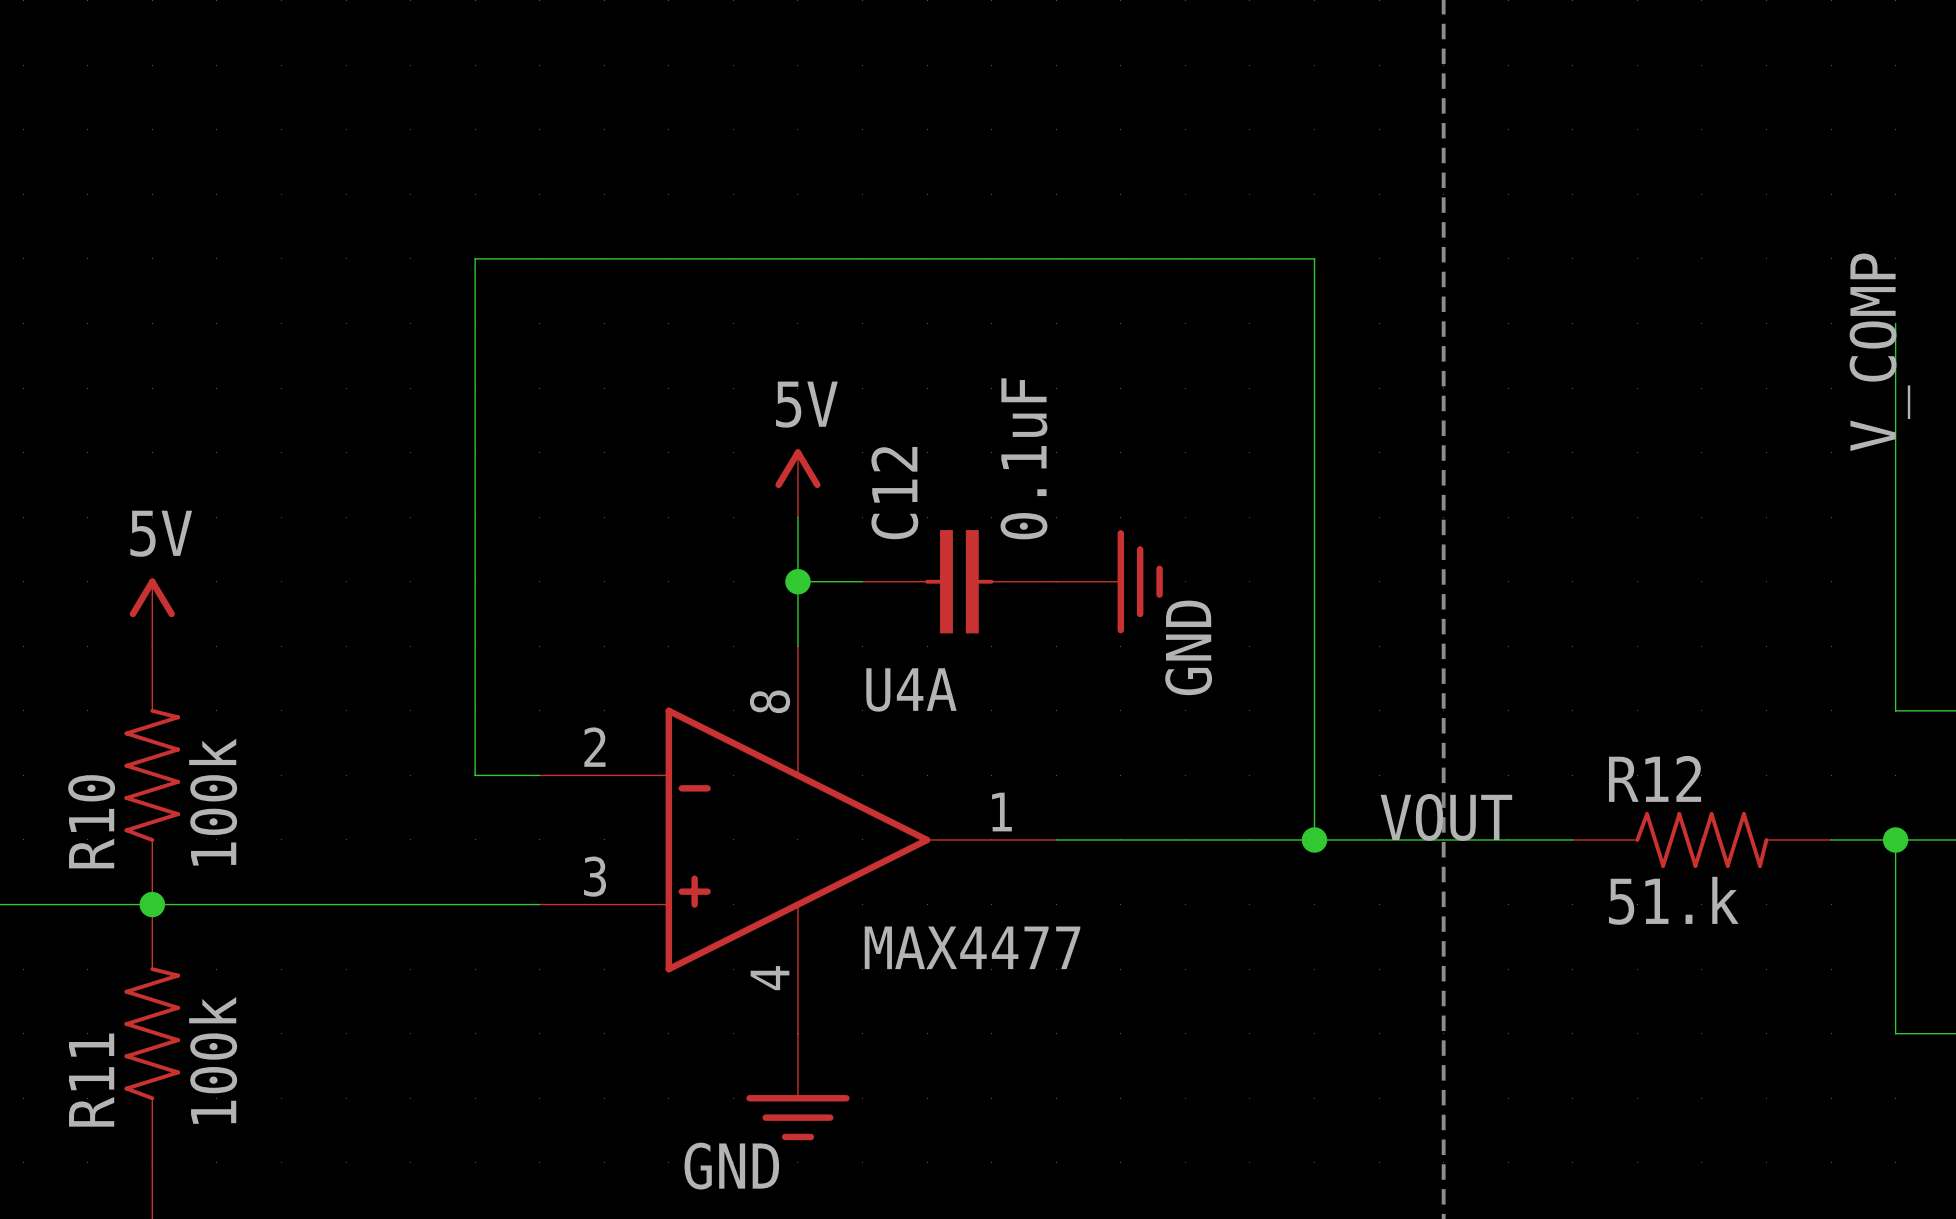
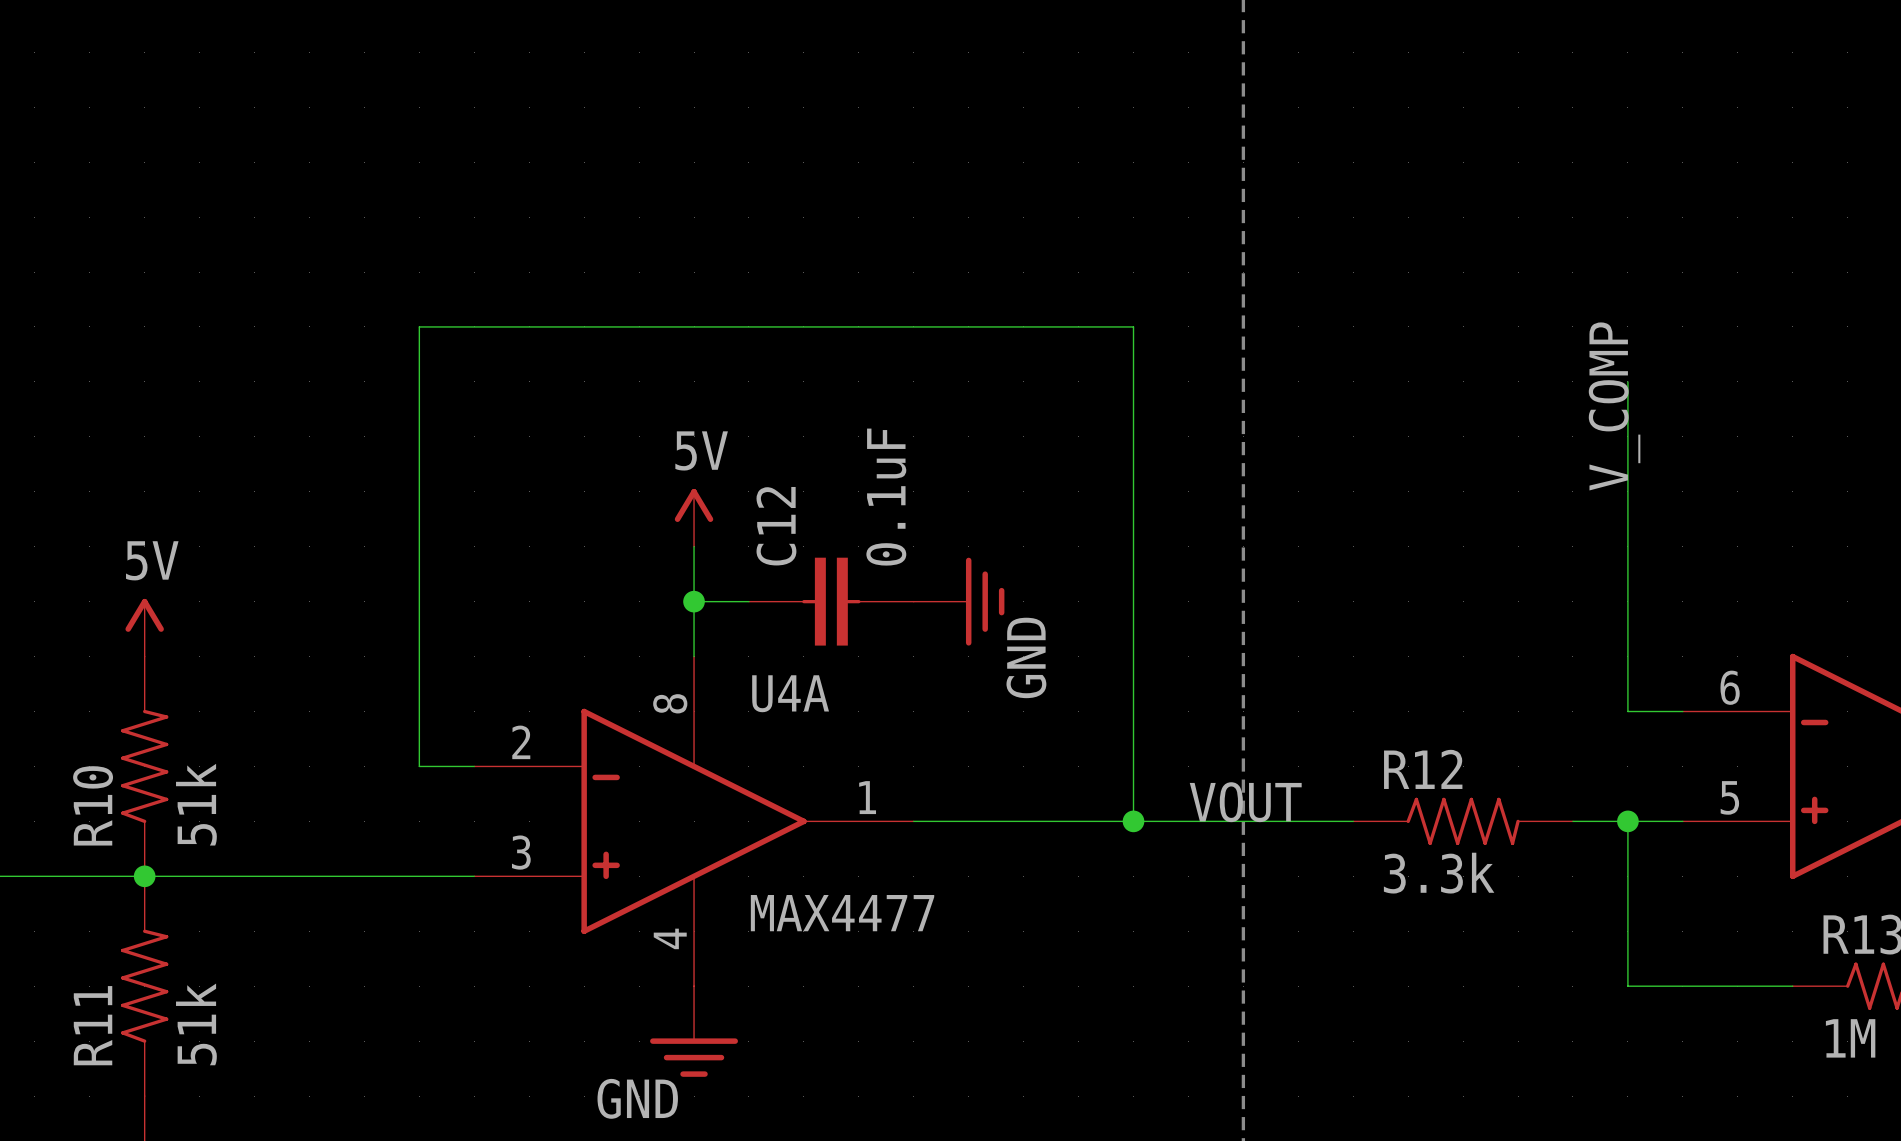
R10 value: 100k (213, 802) -> 51k (196, 804)
R12 value: 51.k (1673, 900) -> 3.3k (1439, 873)
R11 value: 100k (213, 1060) -> 51k (196, 1024)

